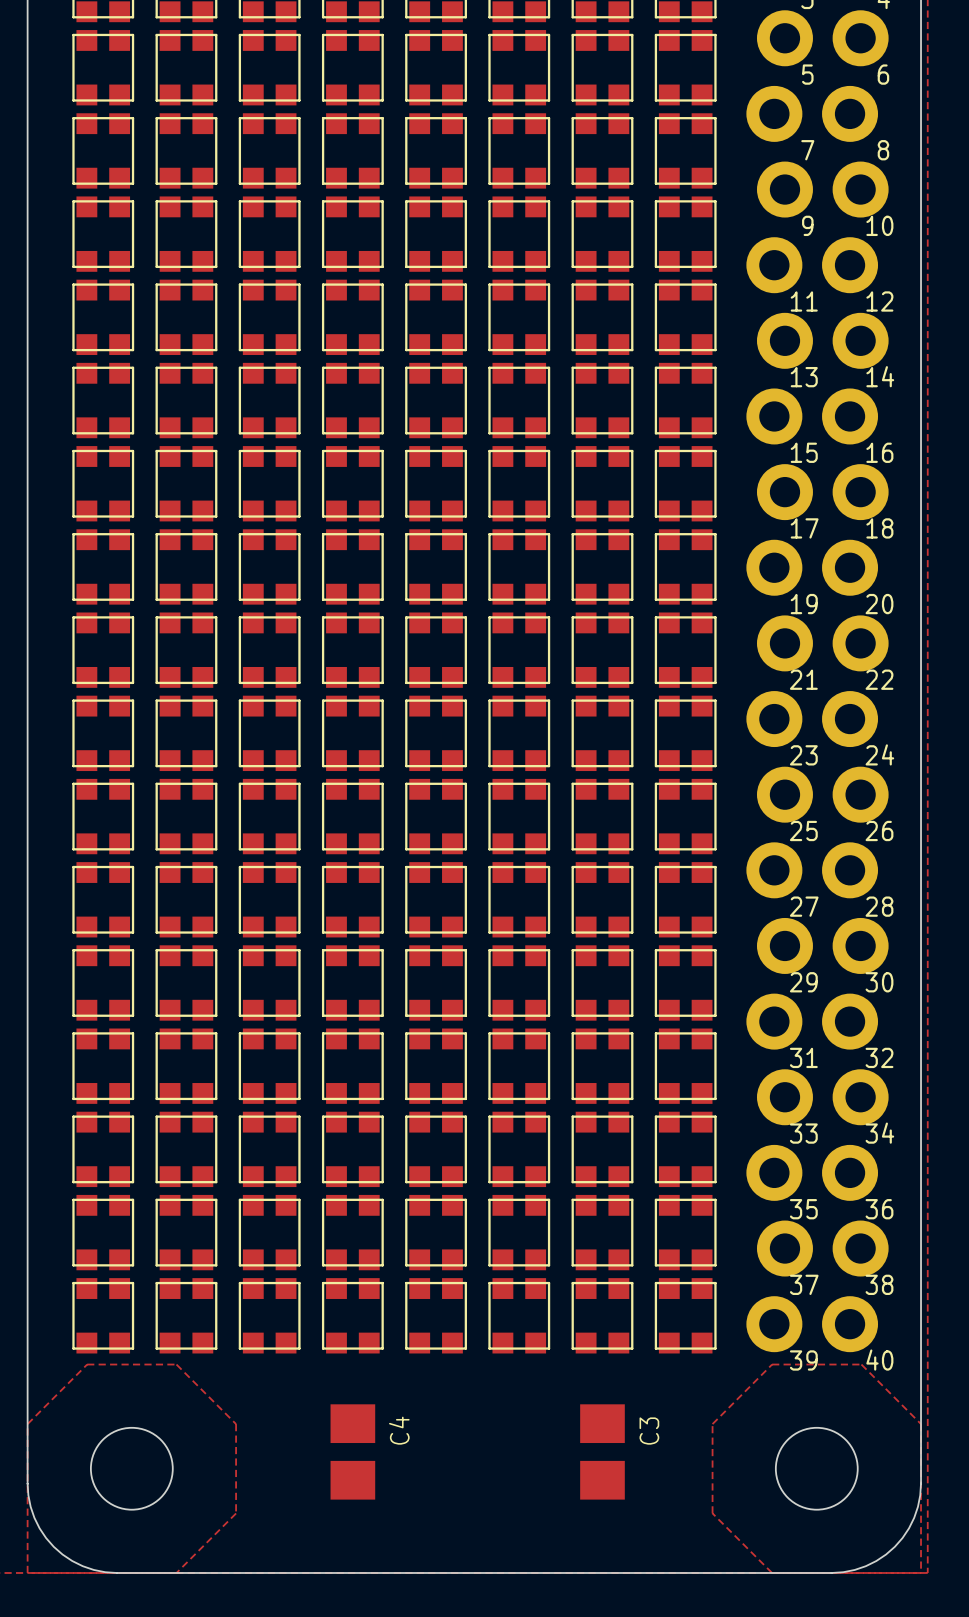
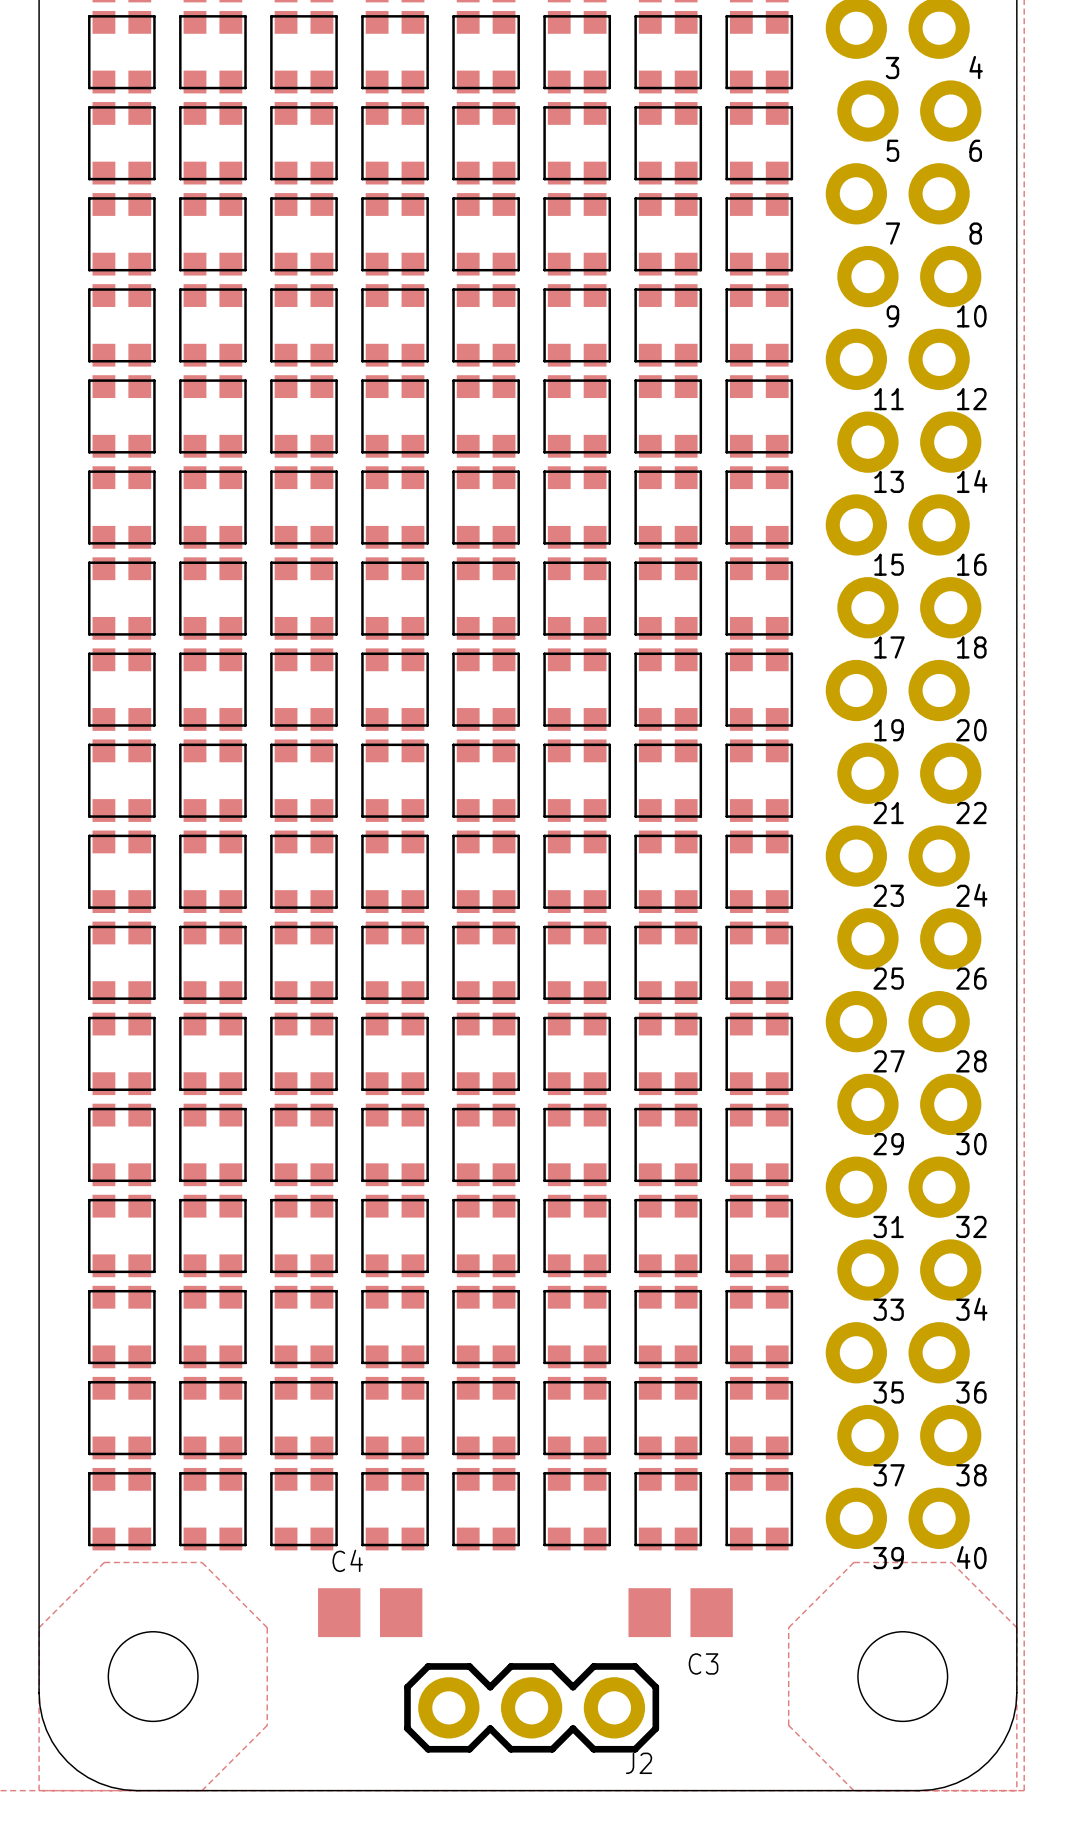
C4 name position: C4 (399, 1430) -> C4 (347, 1560)
C4 rotation: 0° (352, 1451) -> 90° clockwise (370, 1612)
C3 rotation: 0° (602, 1451) -> 90° clockwise (680, 1612)
J2: none -> (531, 1707)

